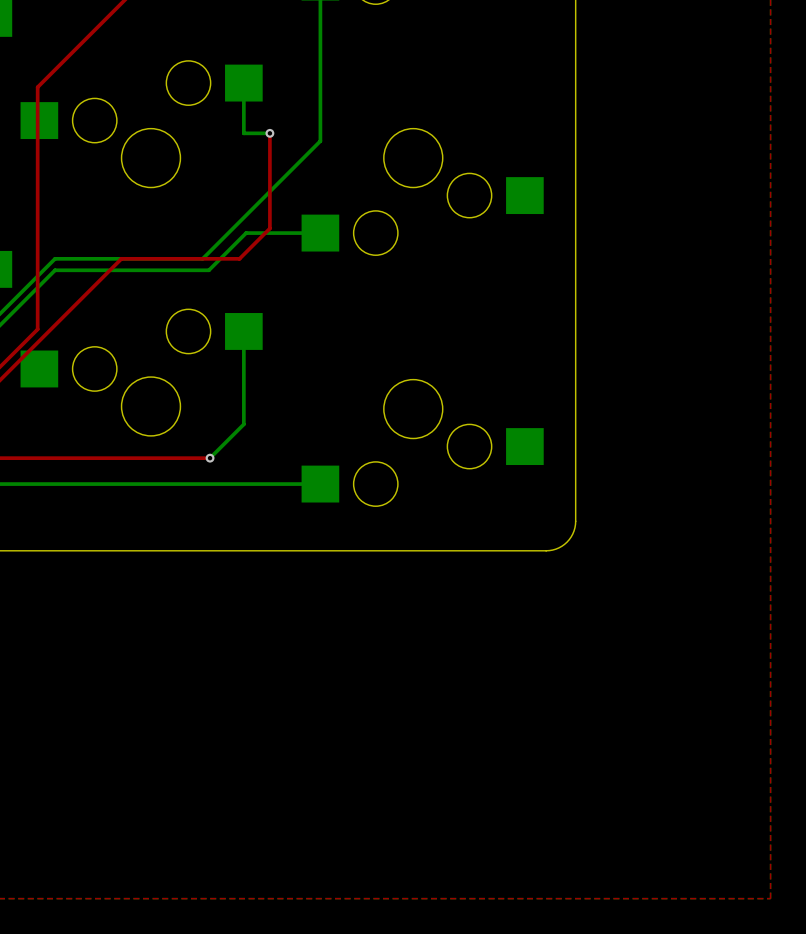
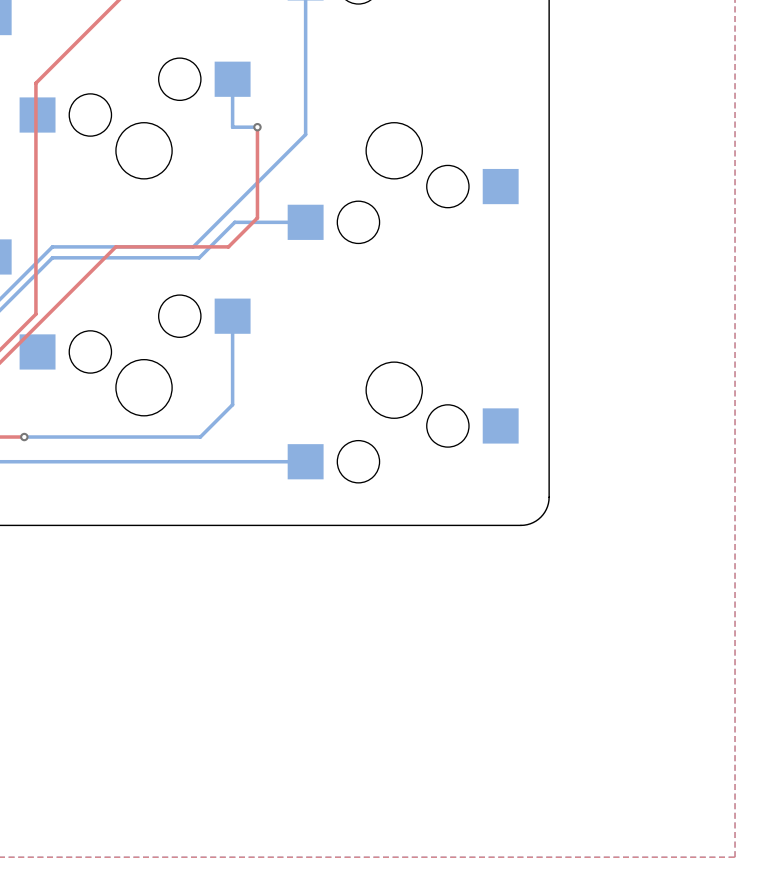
bottom track: none -> (24, 437) (200, 437)
top track: (25, 458) (210, 458) -> none
via: none -> (24, 437)
via: (210, 458) -> none

